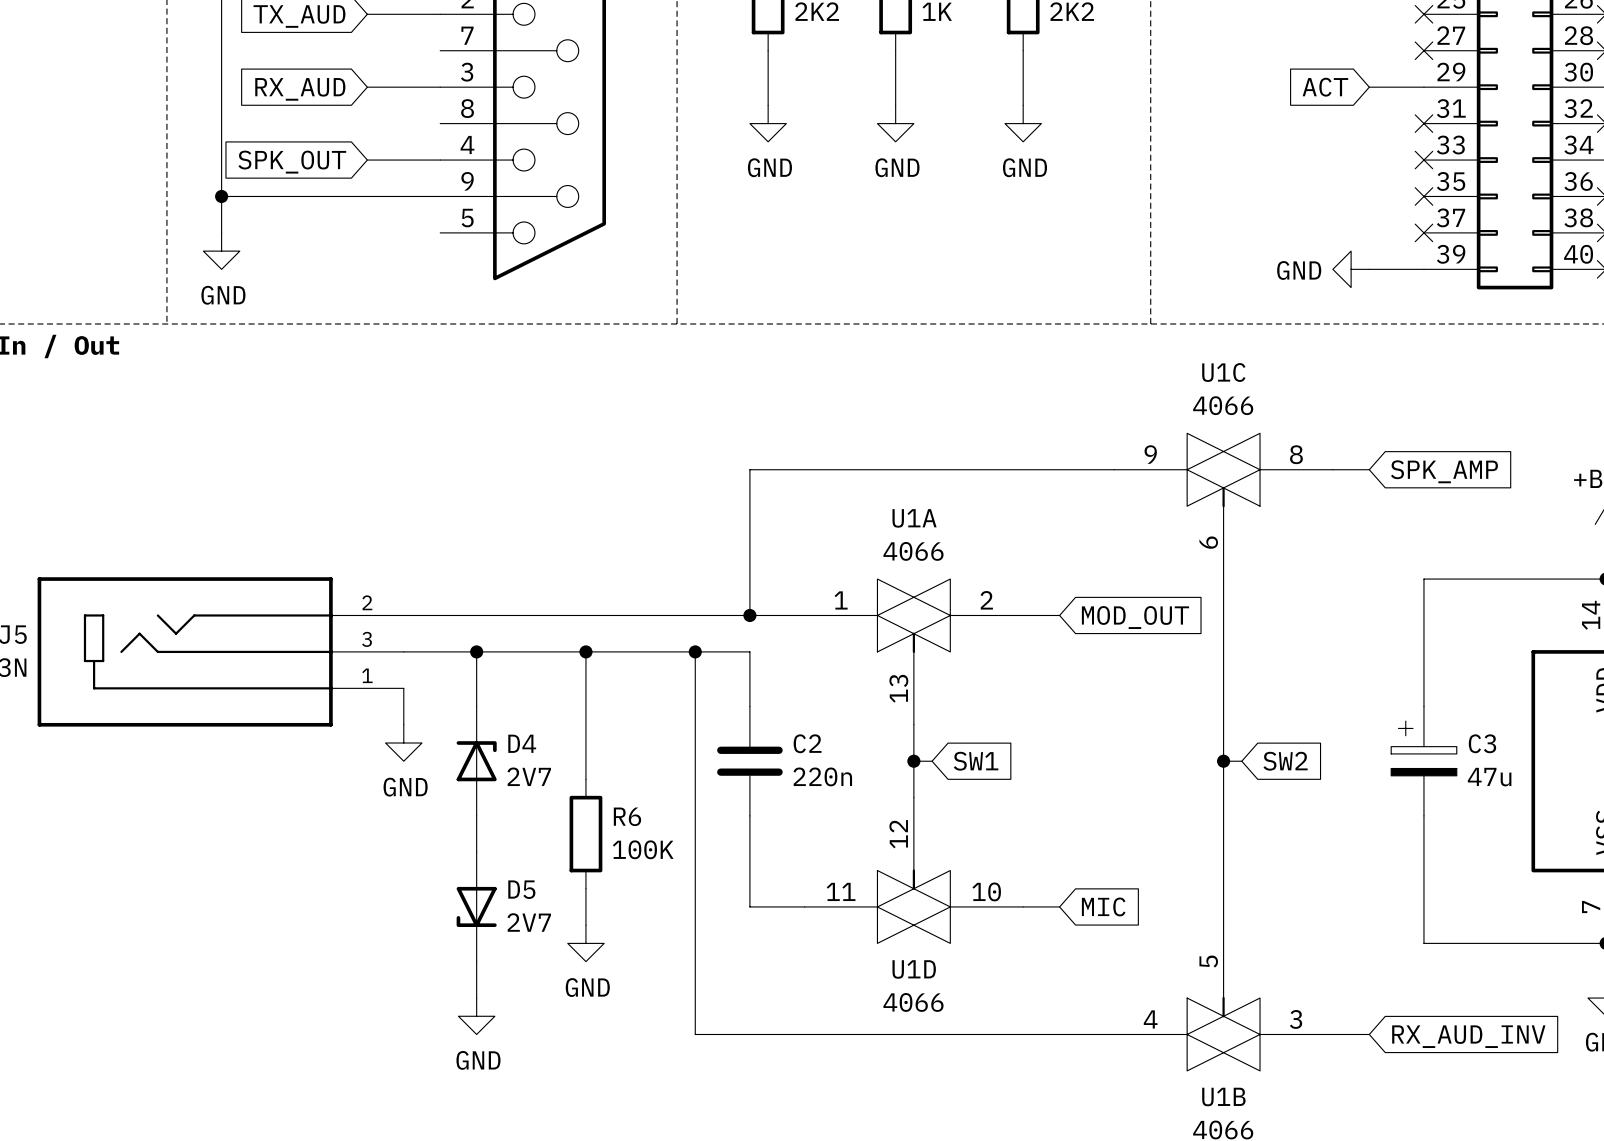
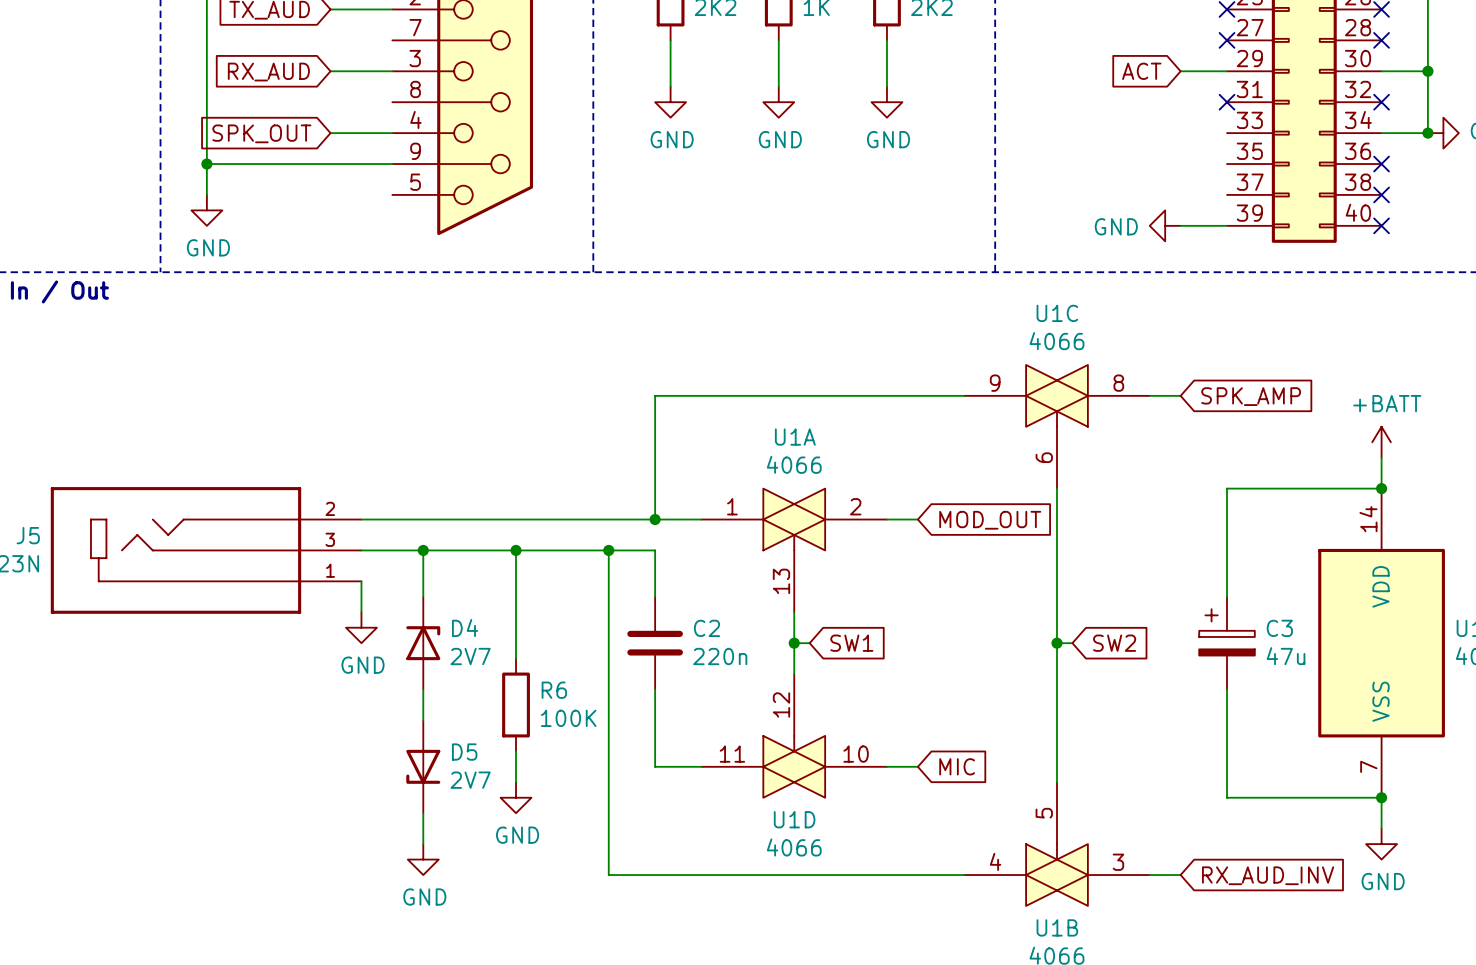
no-connect mark: (1423, 160) -> none
no-connect mark: (1423, 196) -> none
no-connect mark: (1423, 232) -> none

